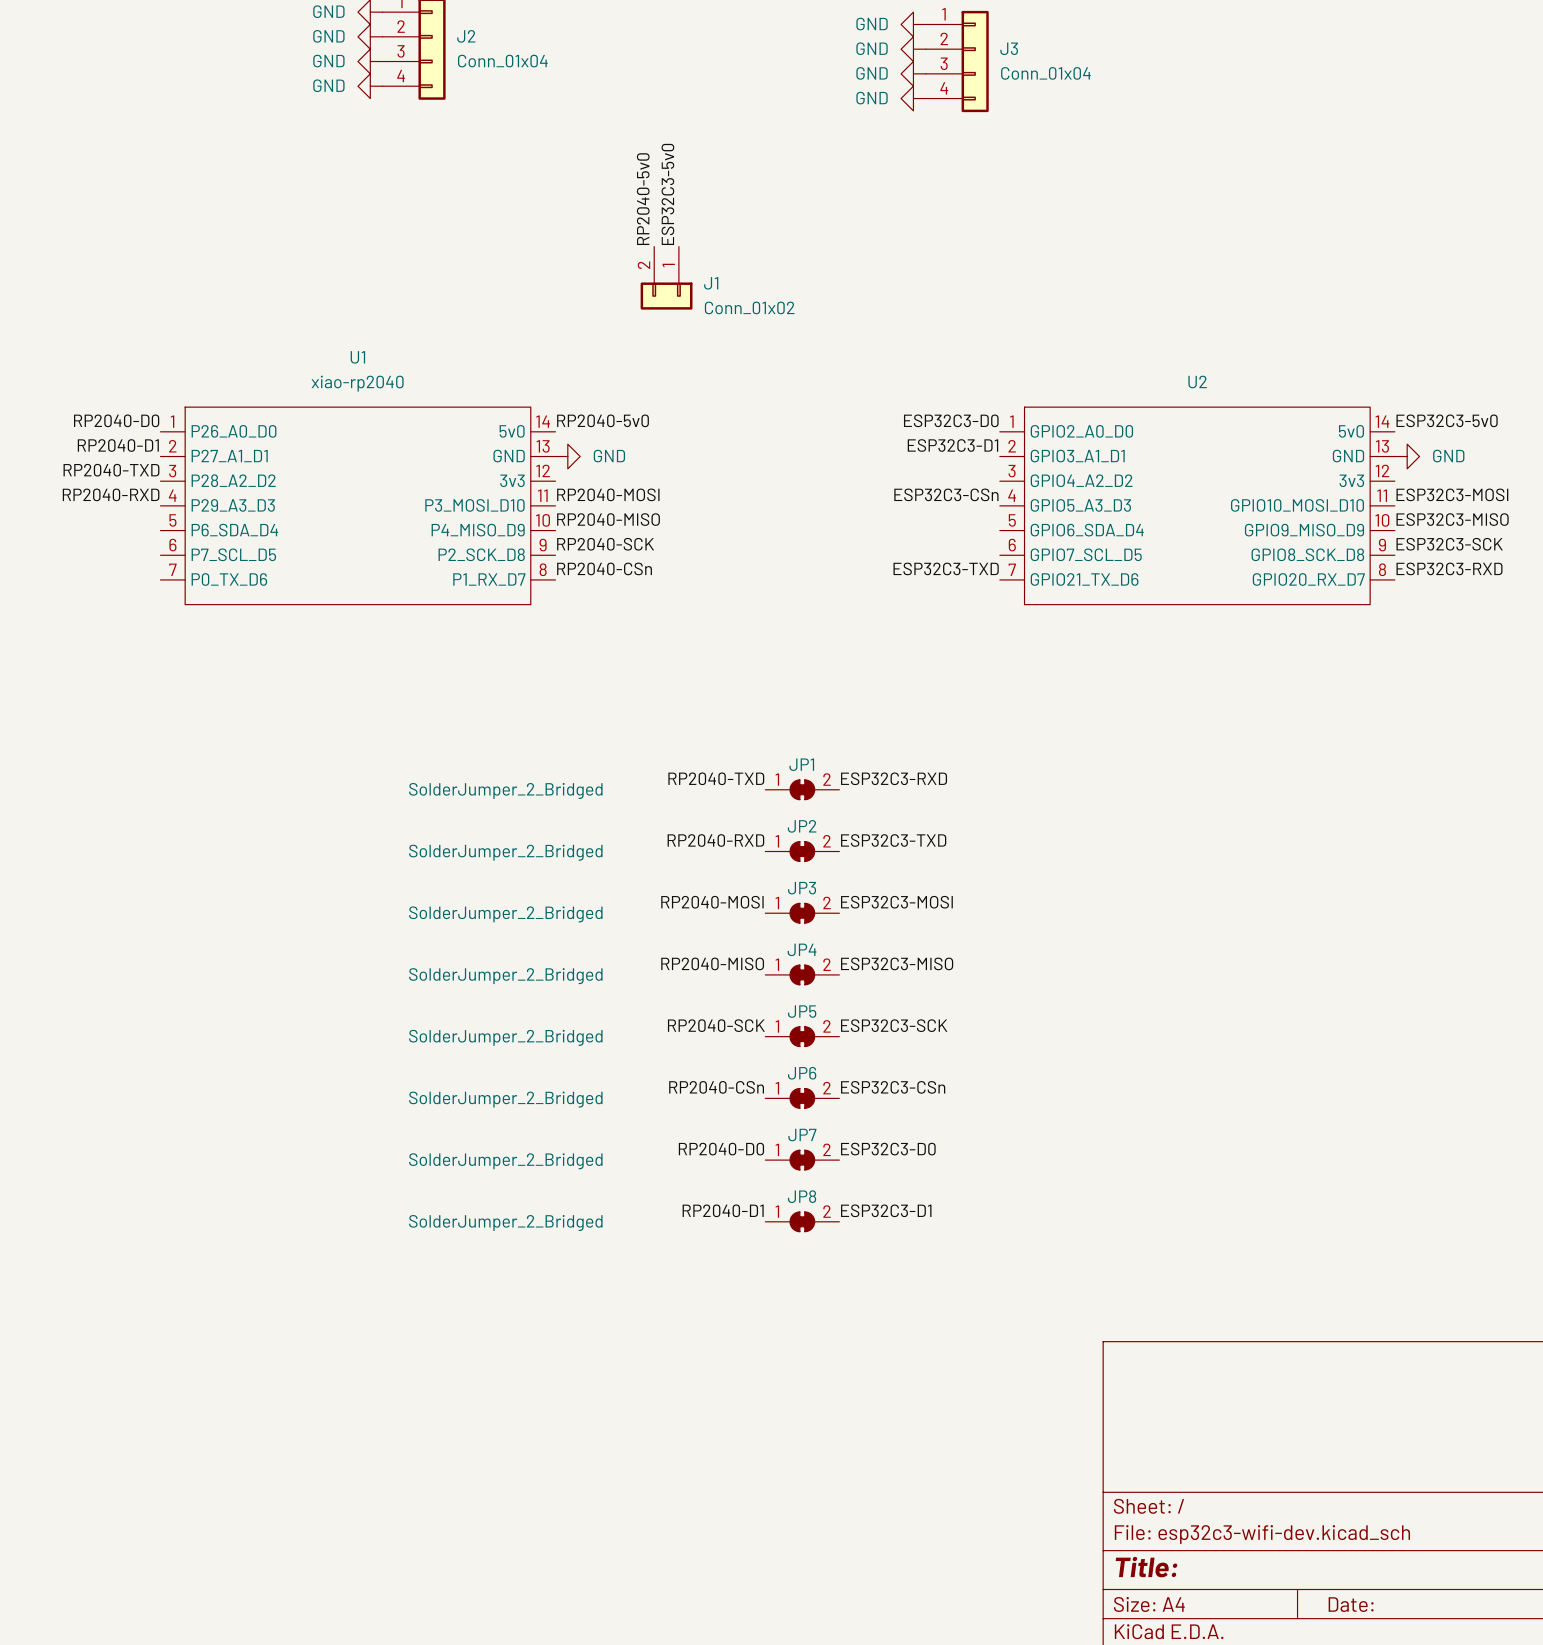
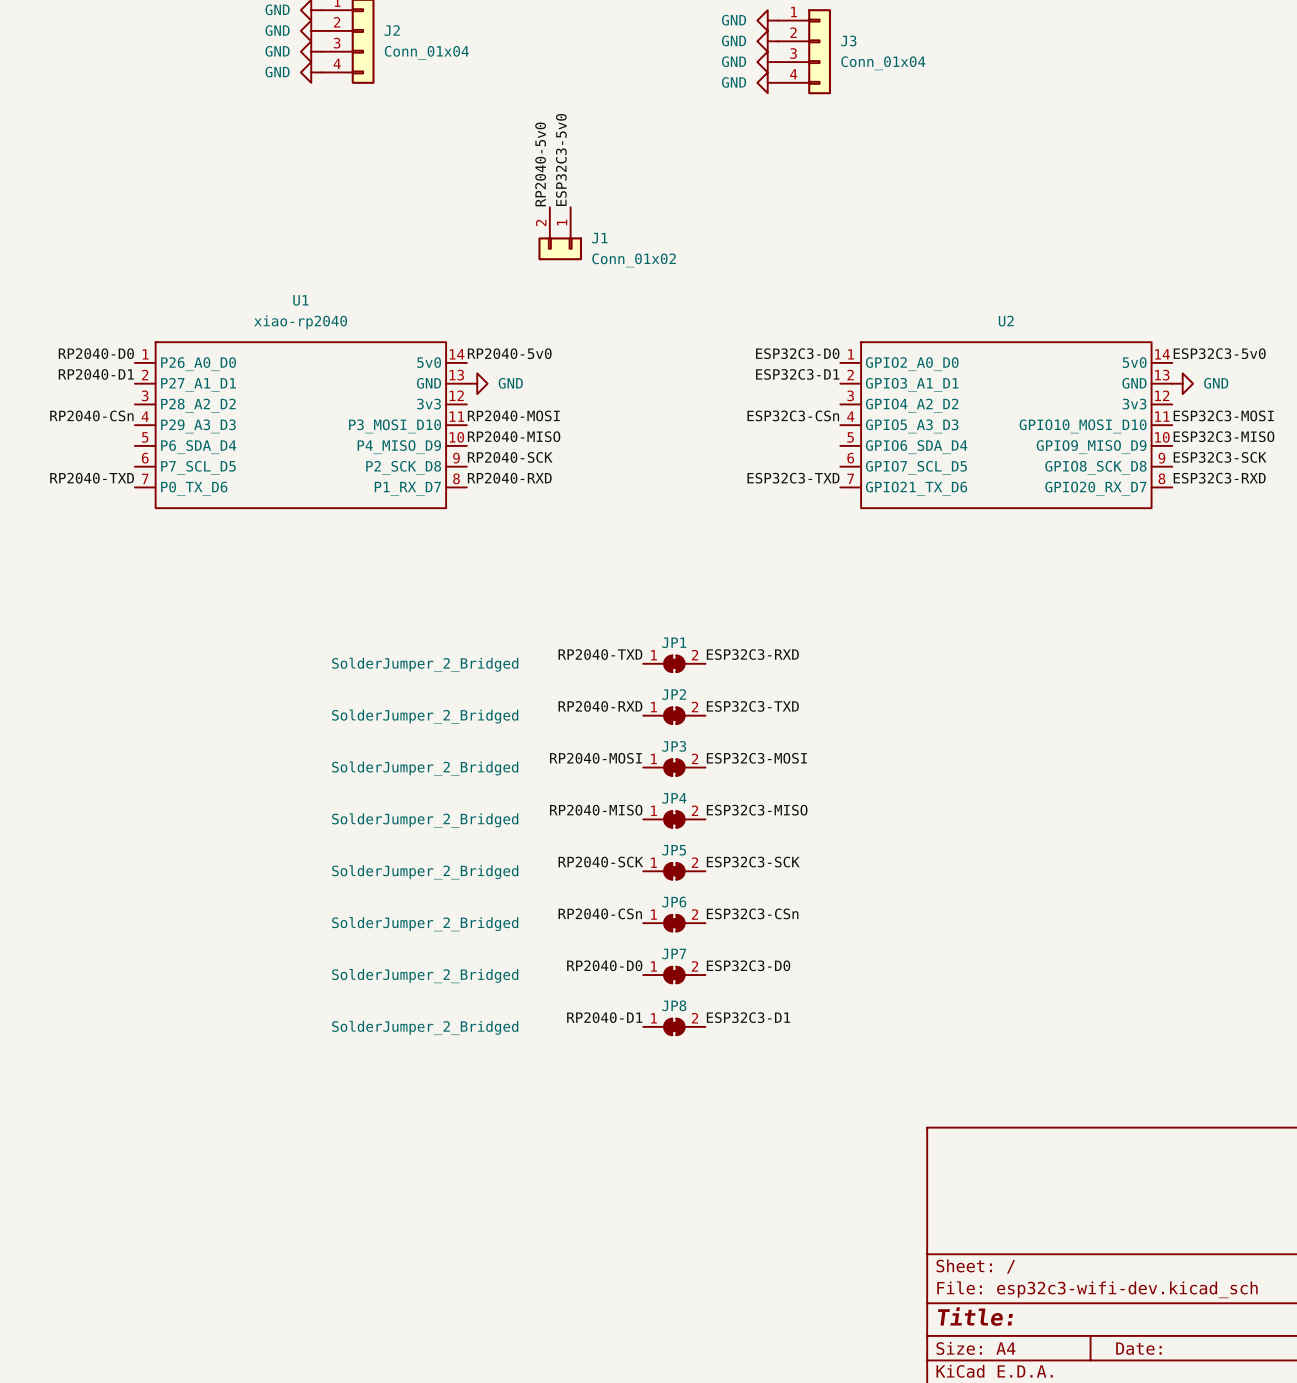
label position: RP2040-TXD (111, 470) -> RP2040-TXD (92, 478)
label: RP2040-RXD (111, 494) -> RP2040-CSn (91, 415)
label: RP2040-CSn (604, 568) -> RP2040-RXD (509, 478)

